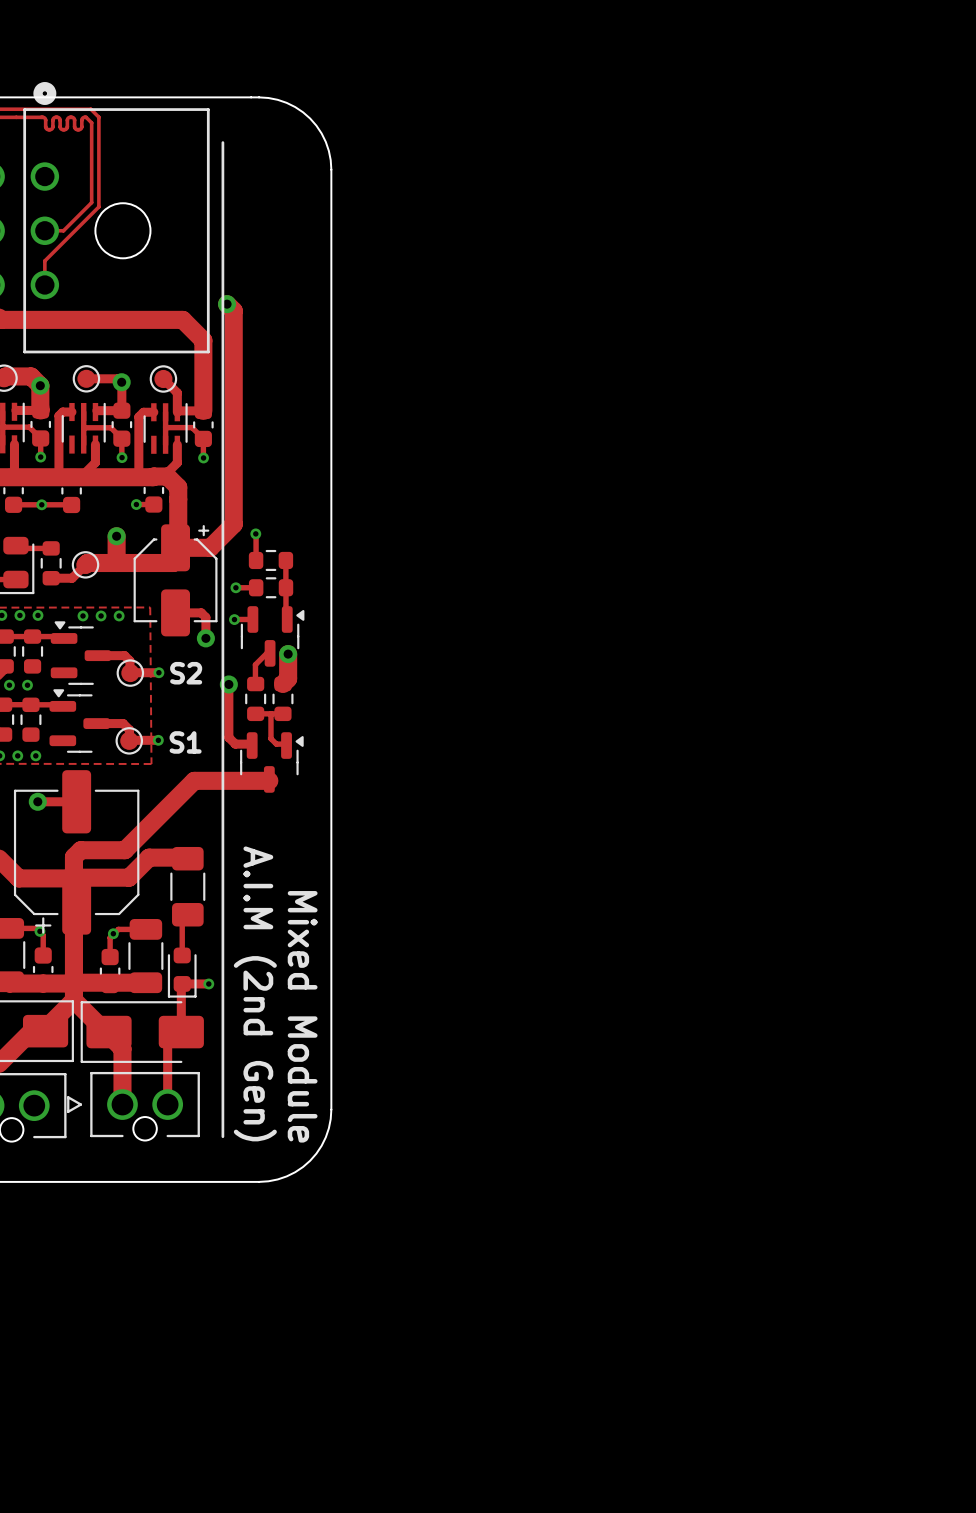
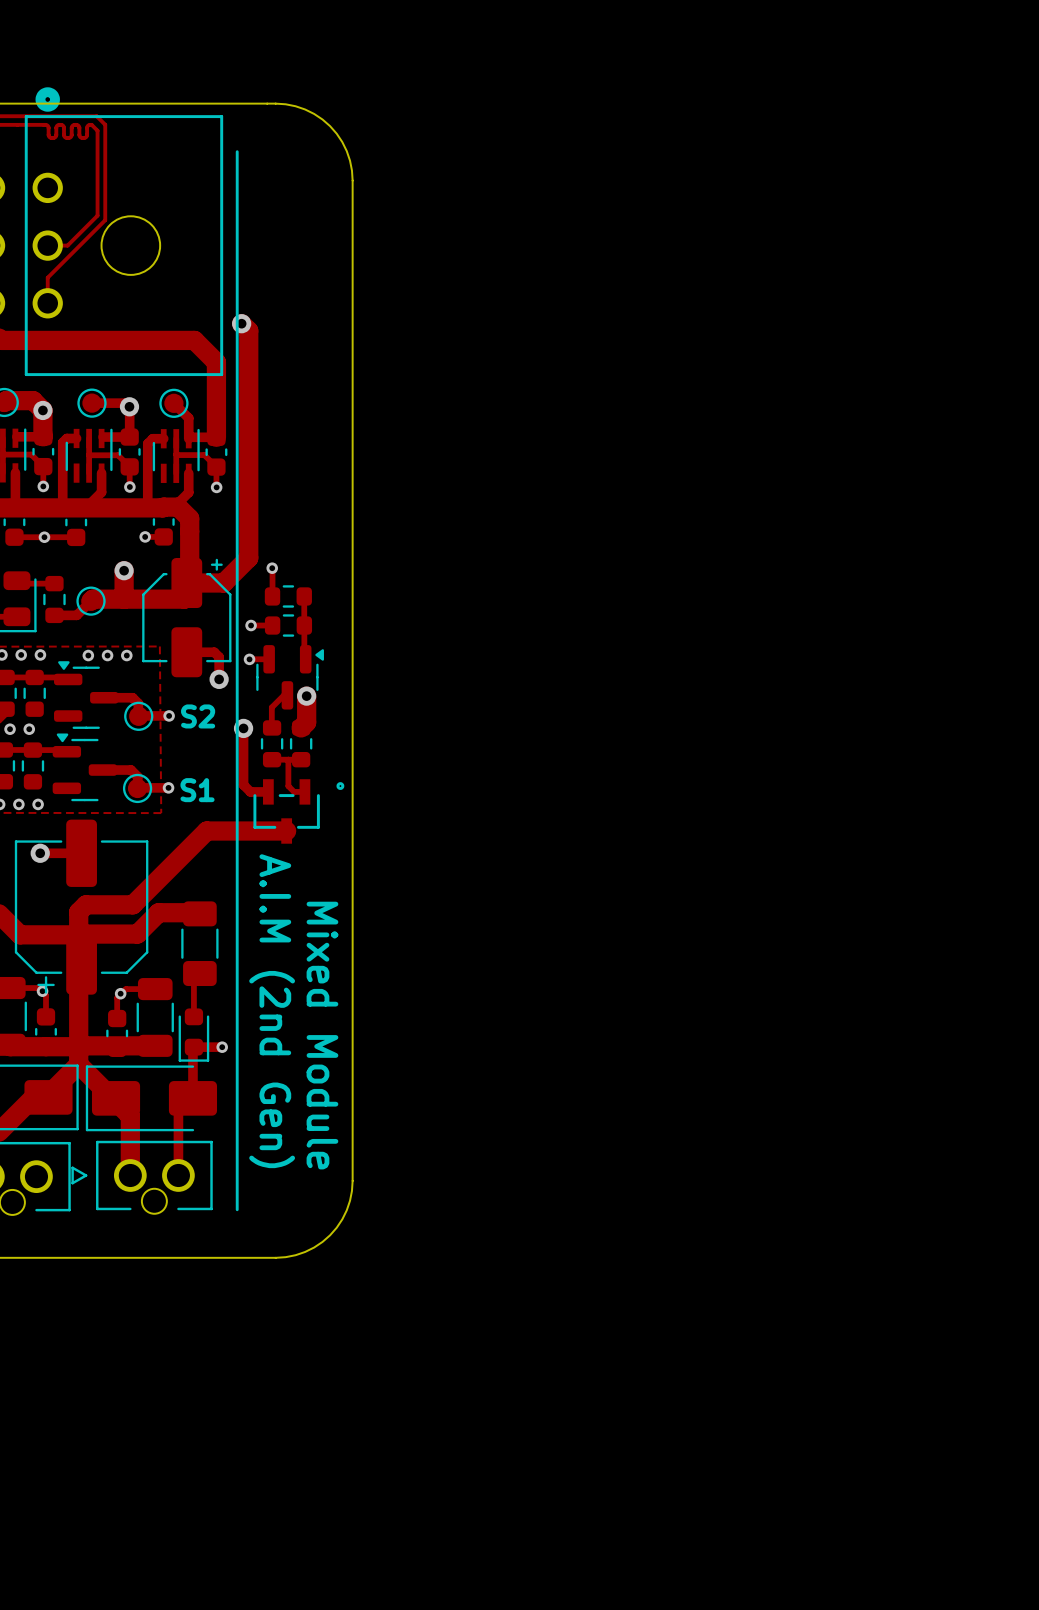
part footprint: [240, 732, 304, 793] -> [253, 779, 345, 844]
text position: A.I.M (2nd Gen) (255, 993) -> A.I.M (2nd Gen) (272, 1011)
text position: Mixed Module (302, 1016) -> Mixed Module (322, 1035)

